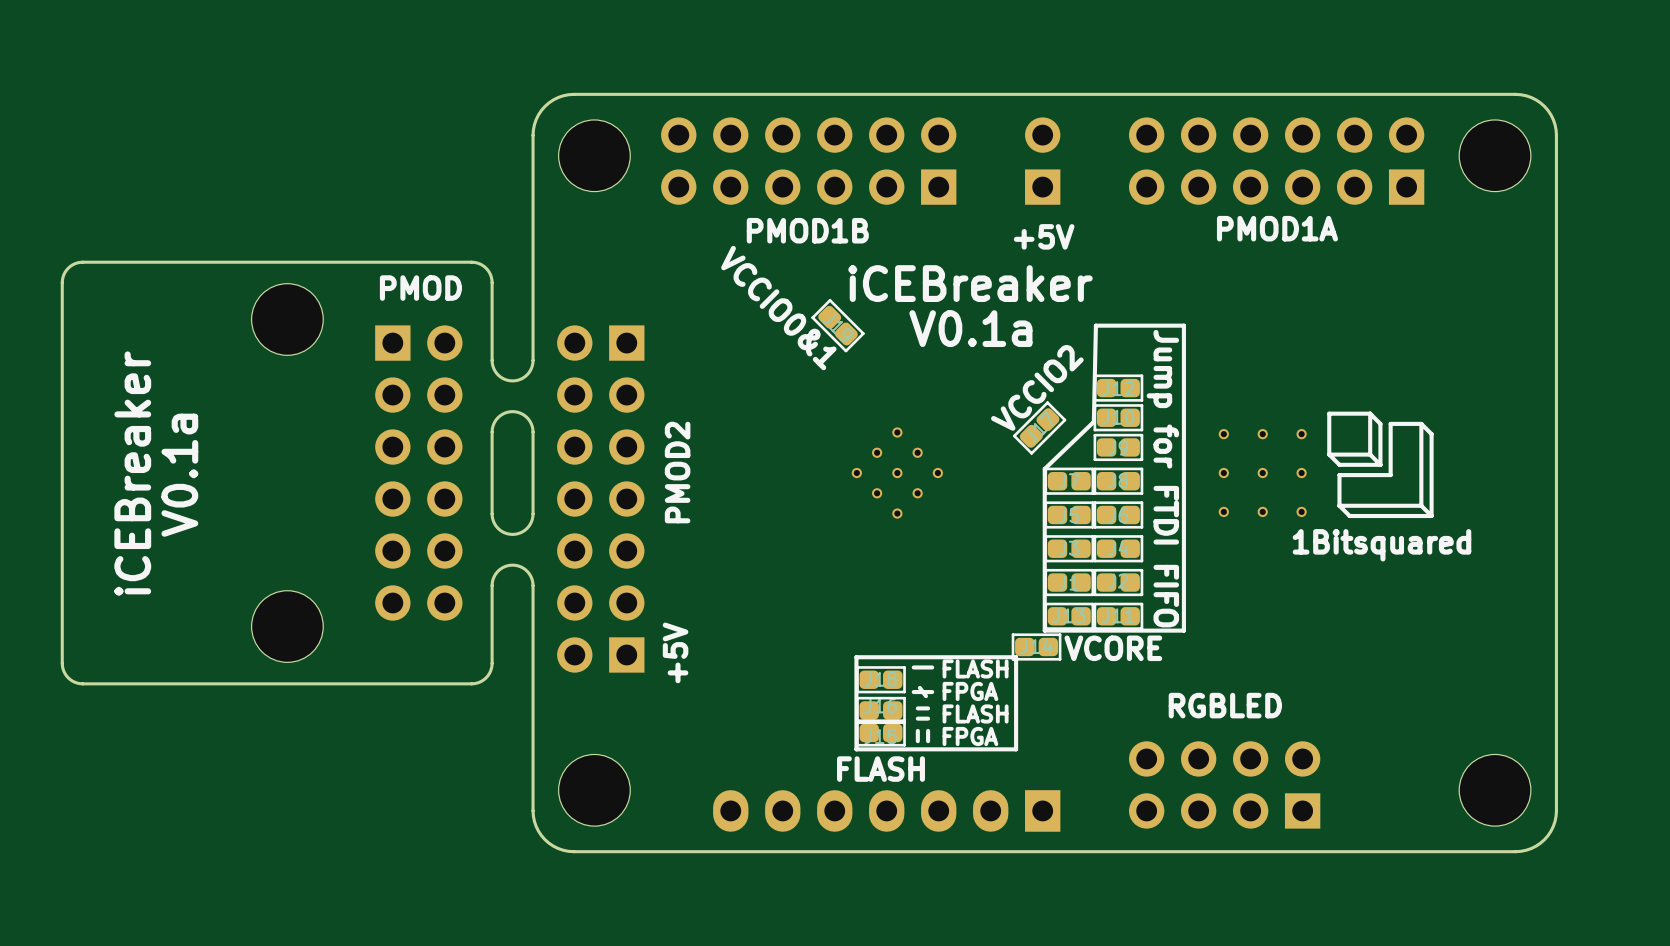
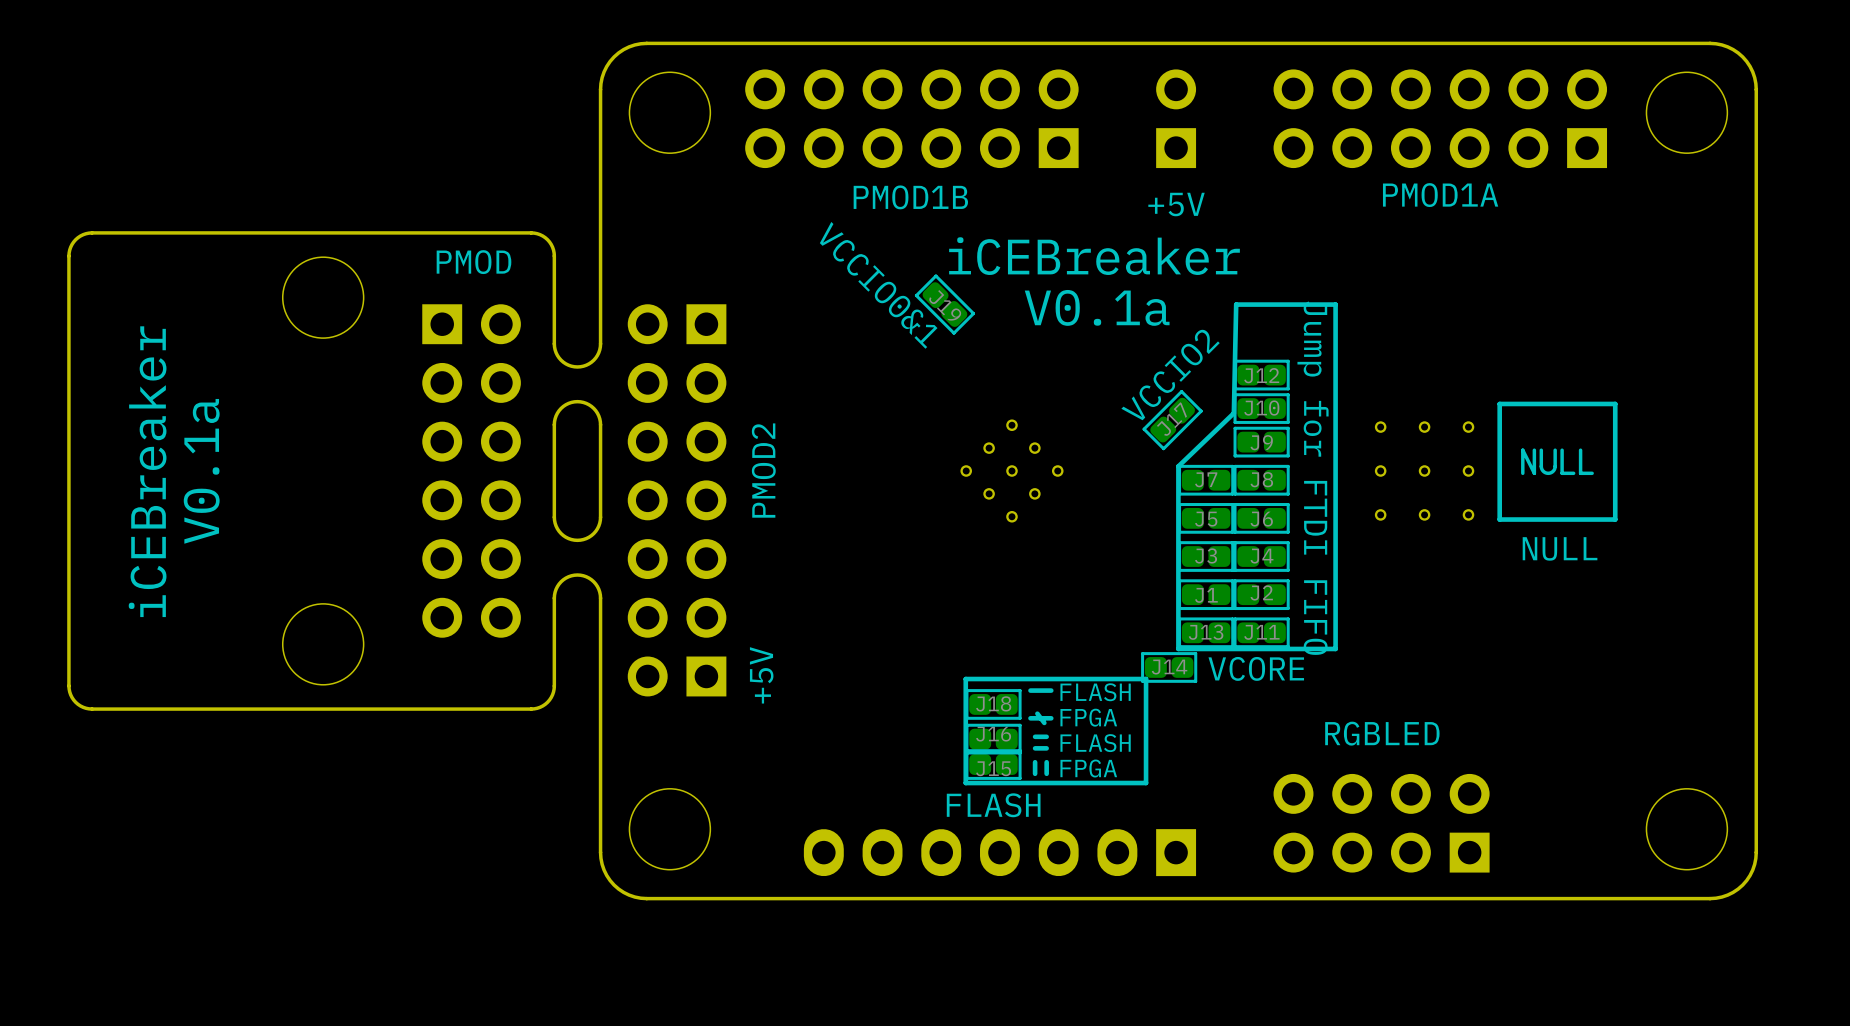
drawing shape: [1327, 411, 1434, 519] -> [1497, 401, 1618, 522]
text: 1Bitsquared (1381, 545) -> NULL (1560, 548)

